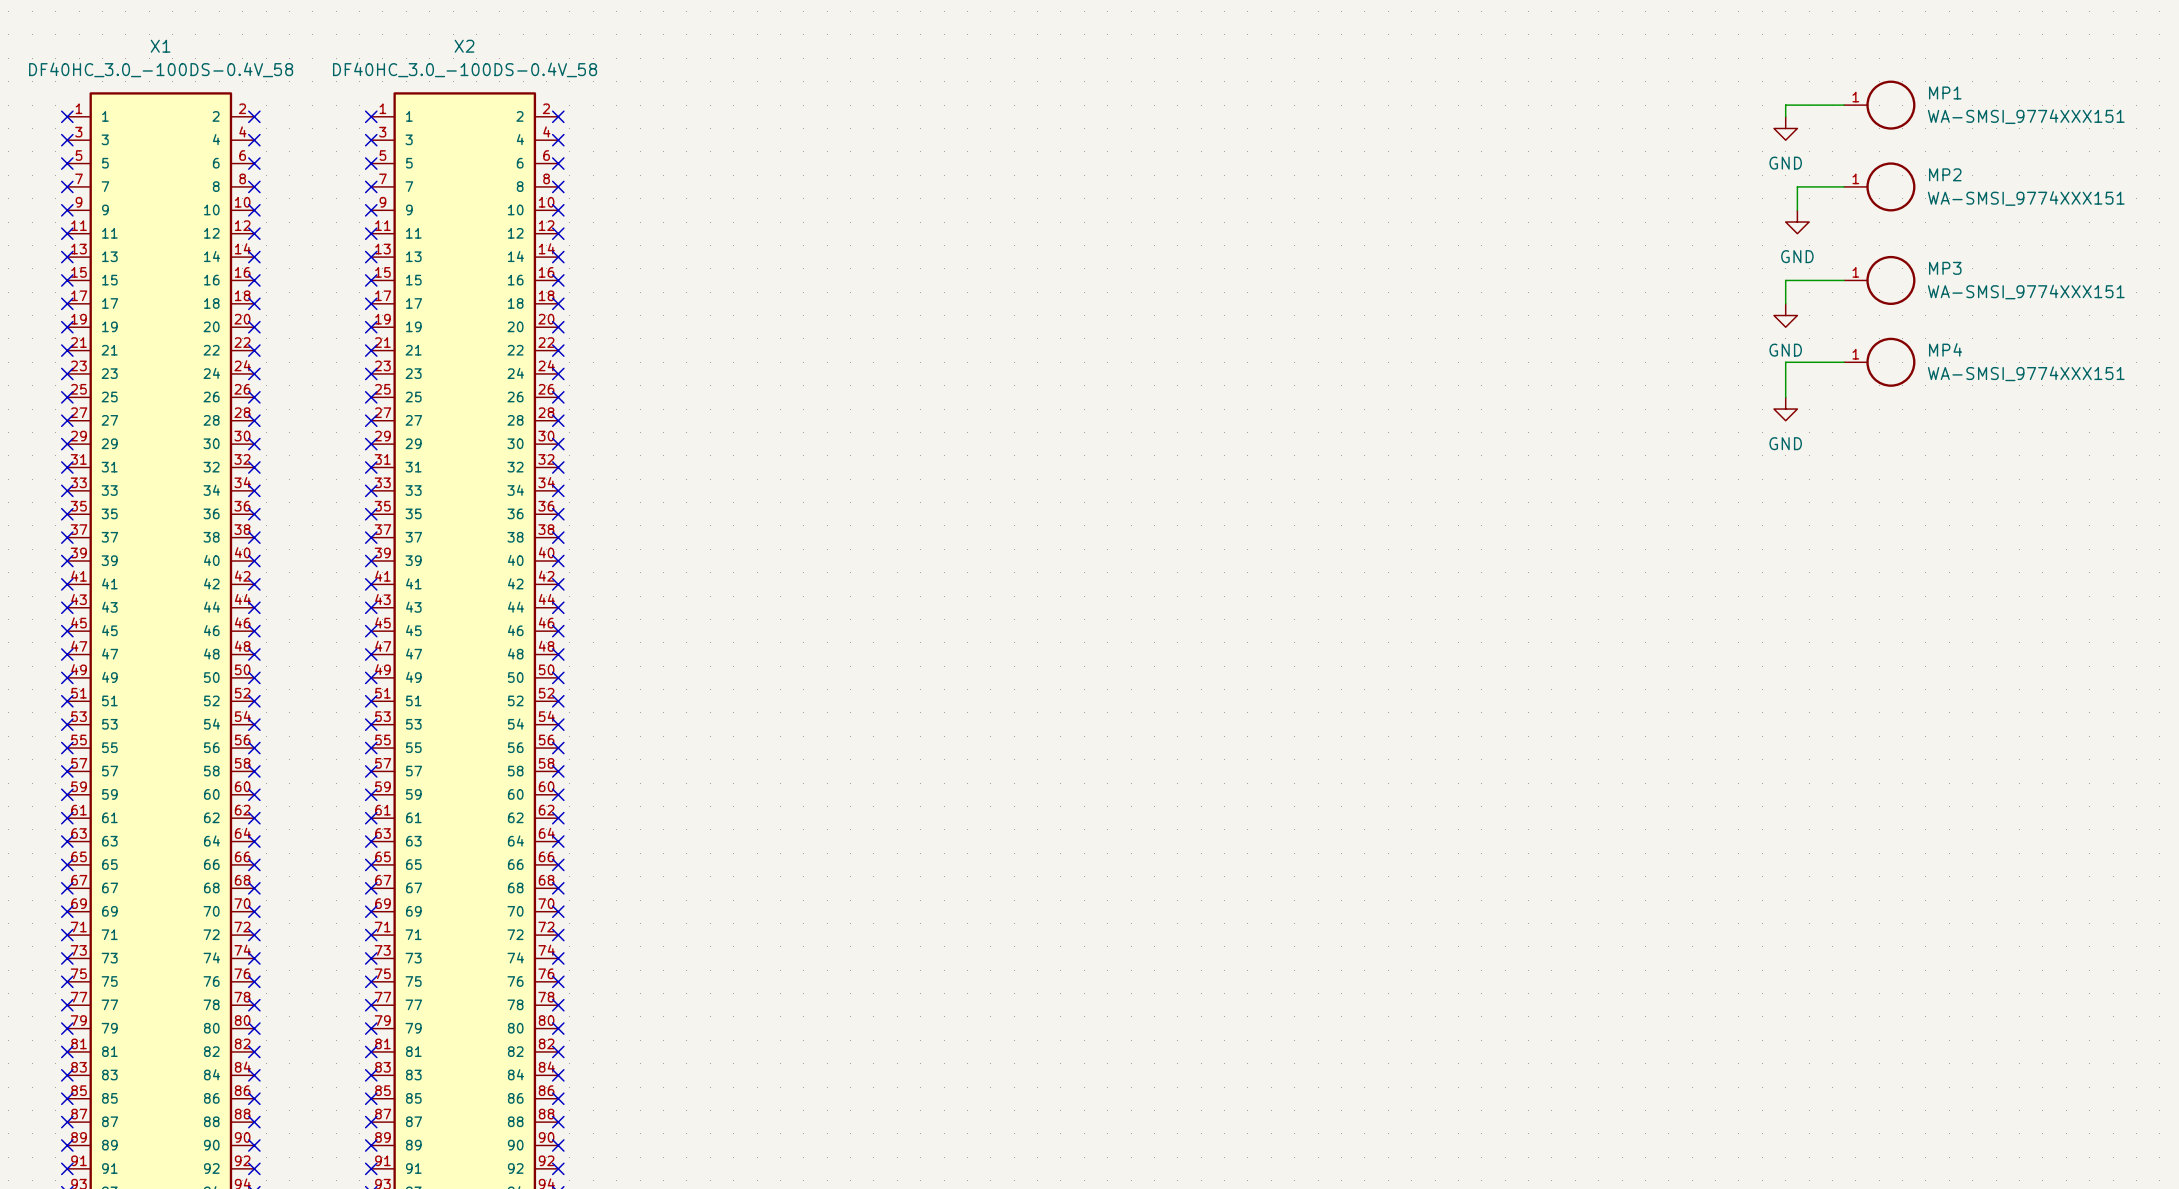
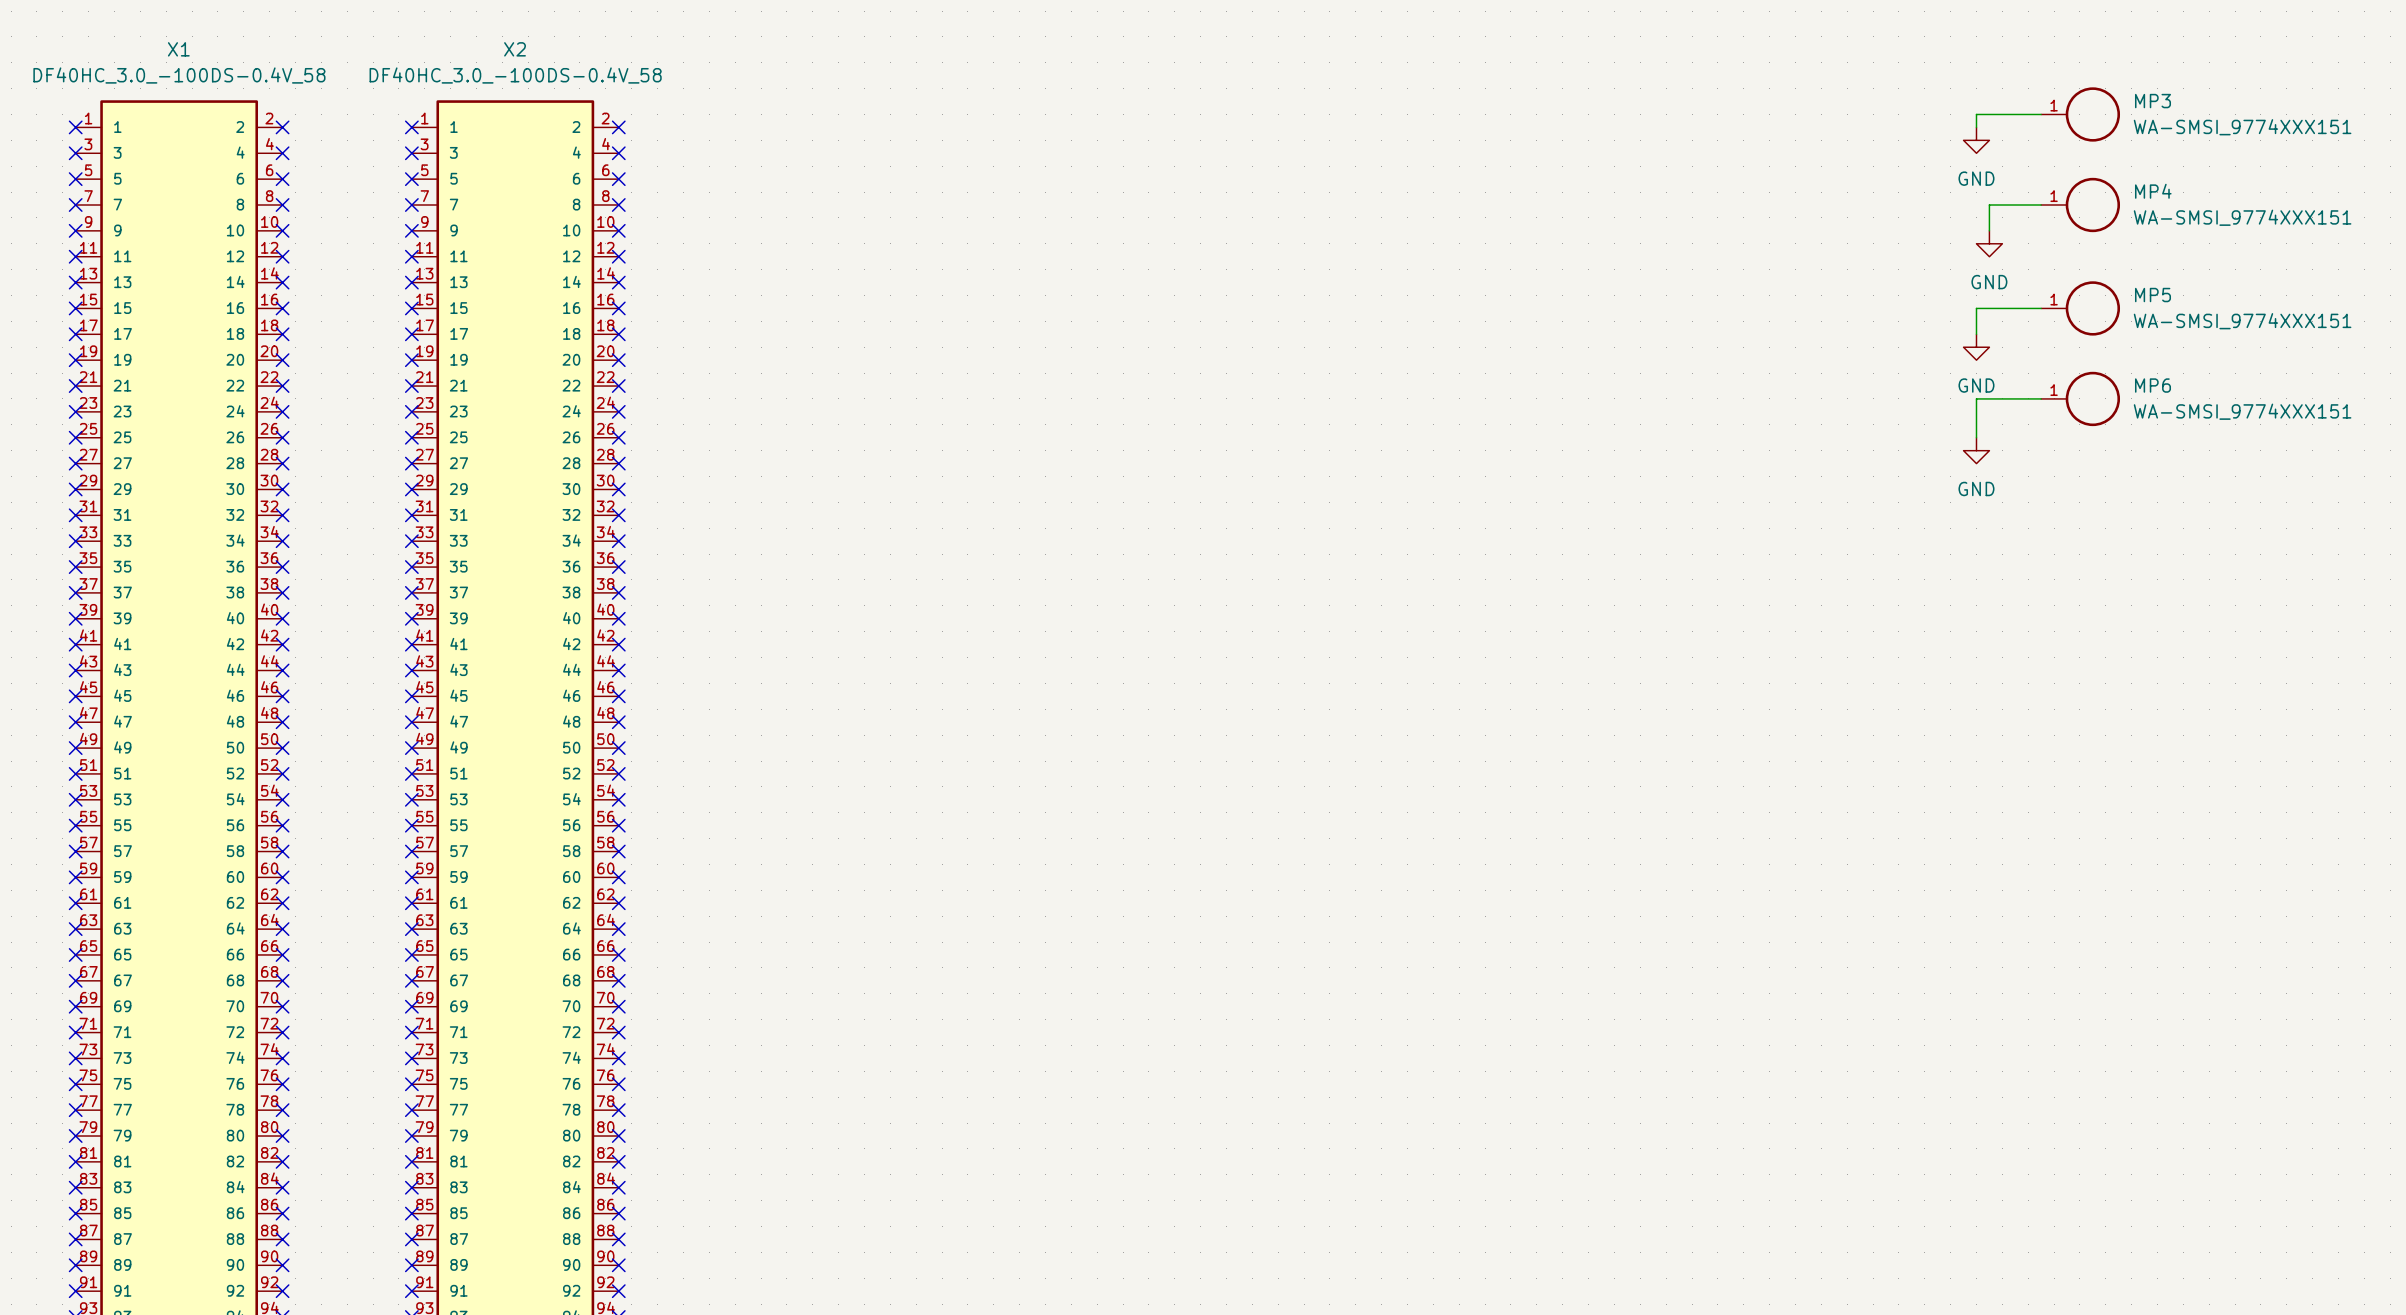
MP1 name: MP1 (1945, 92) -> MP3 (2152, 101)
MP2 name: MP2 (1945, 174) -> MP4 (2153, 191)
MP3 name: MP3 (1945, 268) -> MP5 (2152, 295)
MP4 name: MP4 (1945, 349) -> MP6 (2152, 385)

